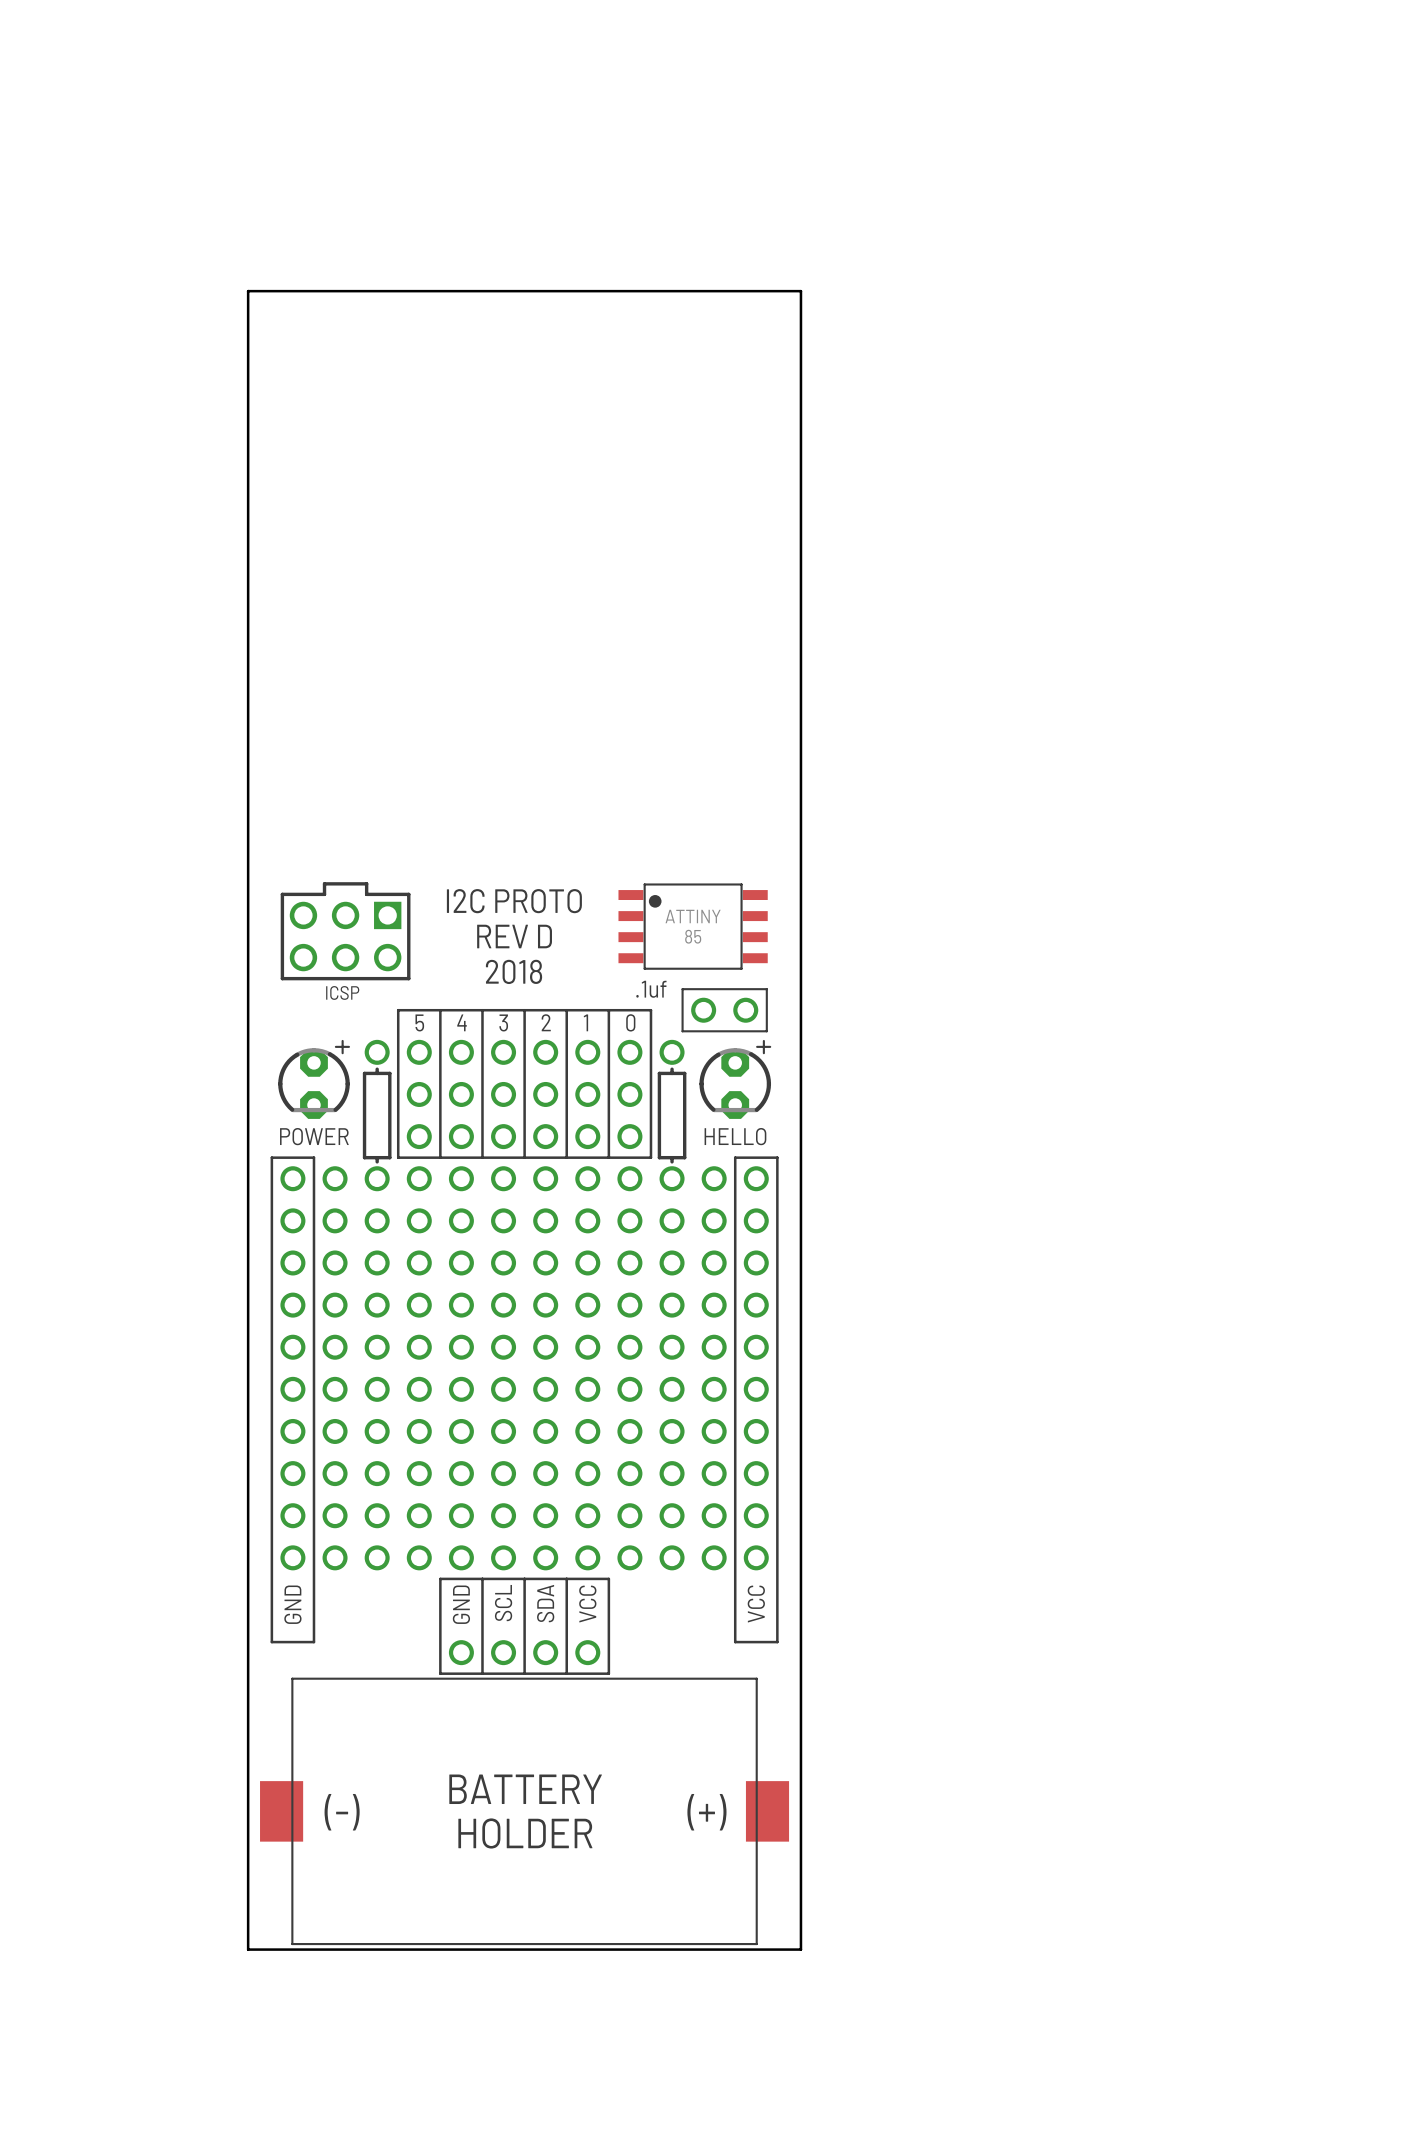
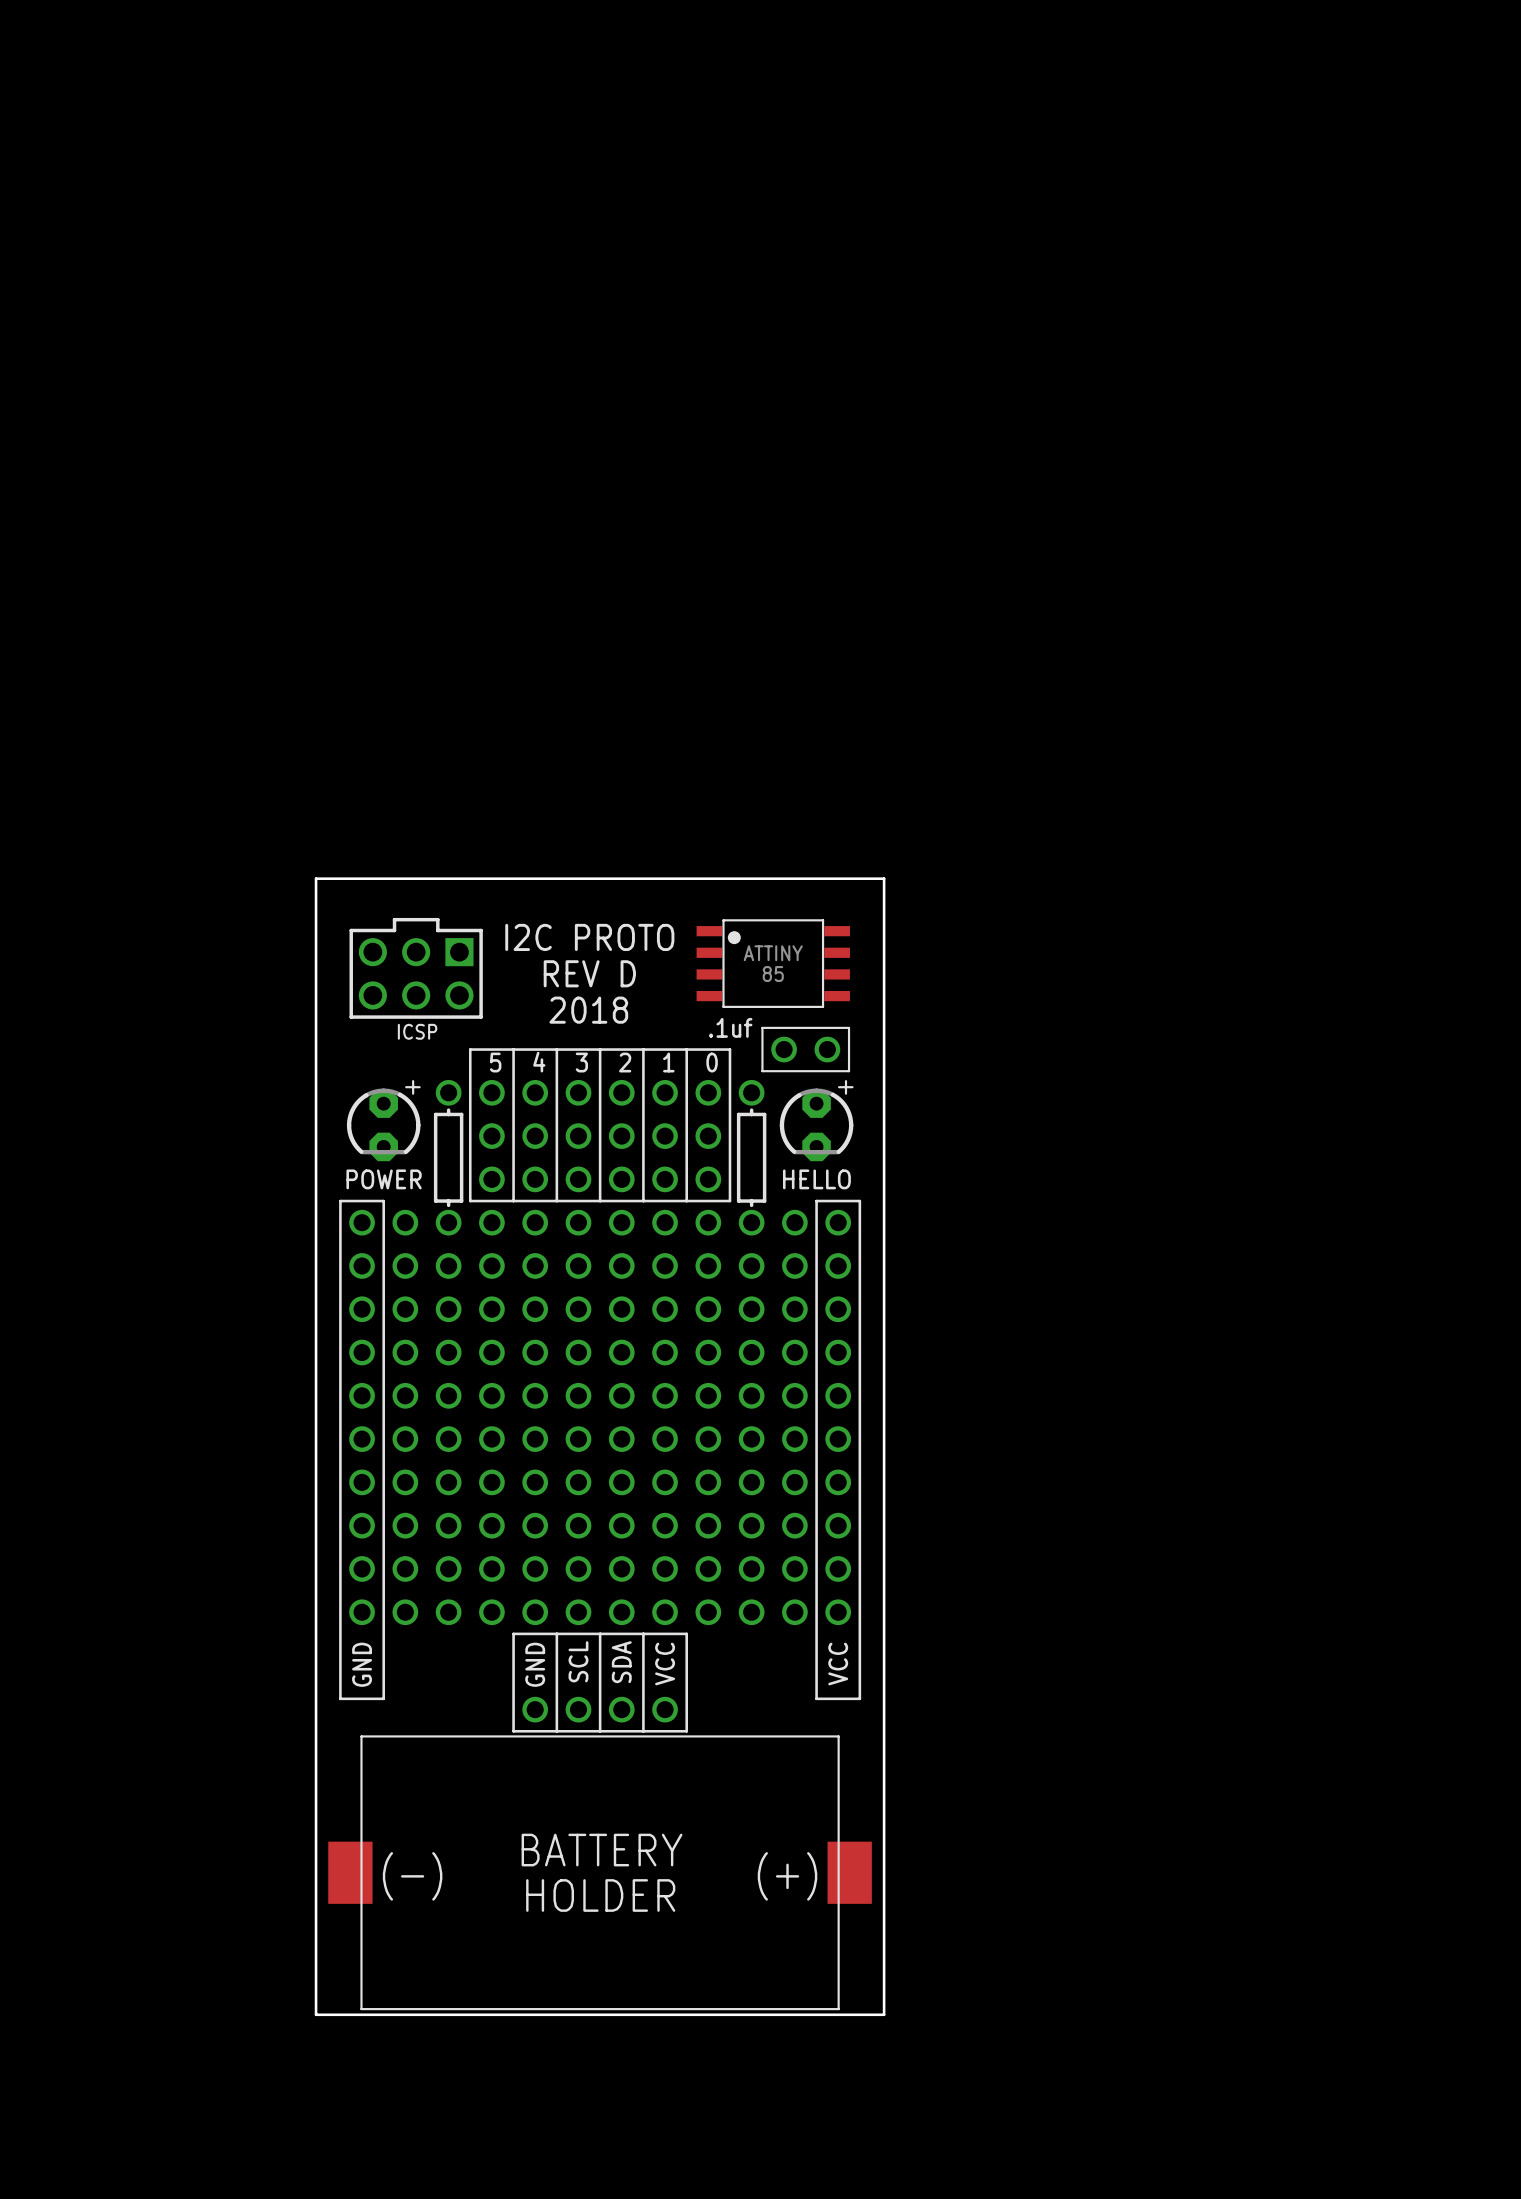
board edge: (248, 843) (248, 291) (800, 291) (800, 843) -> (316, 878) (884, 878)

